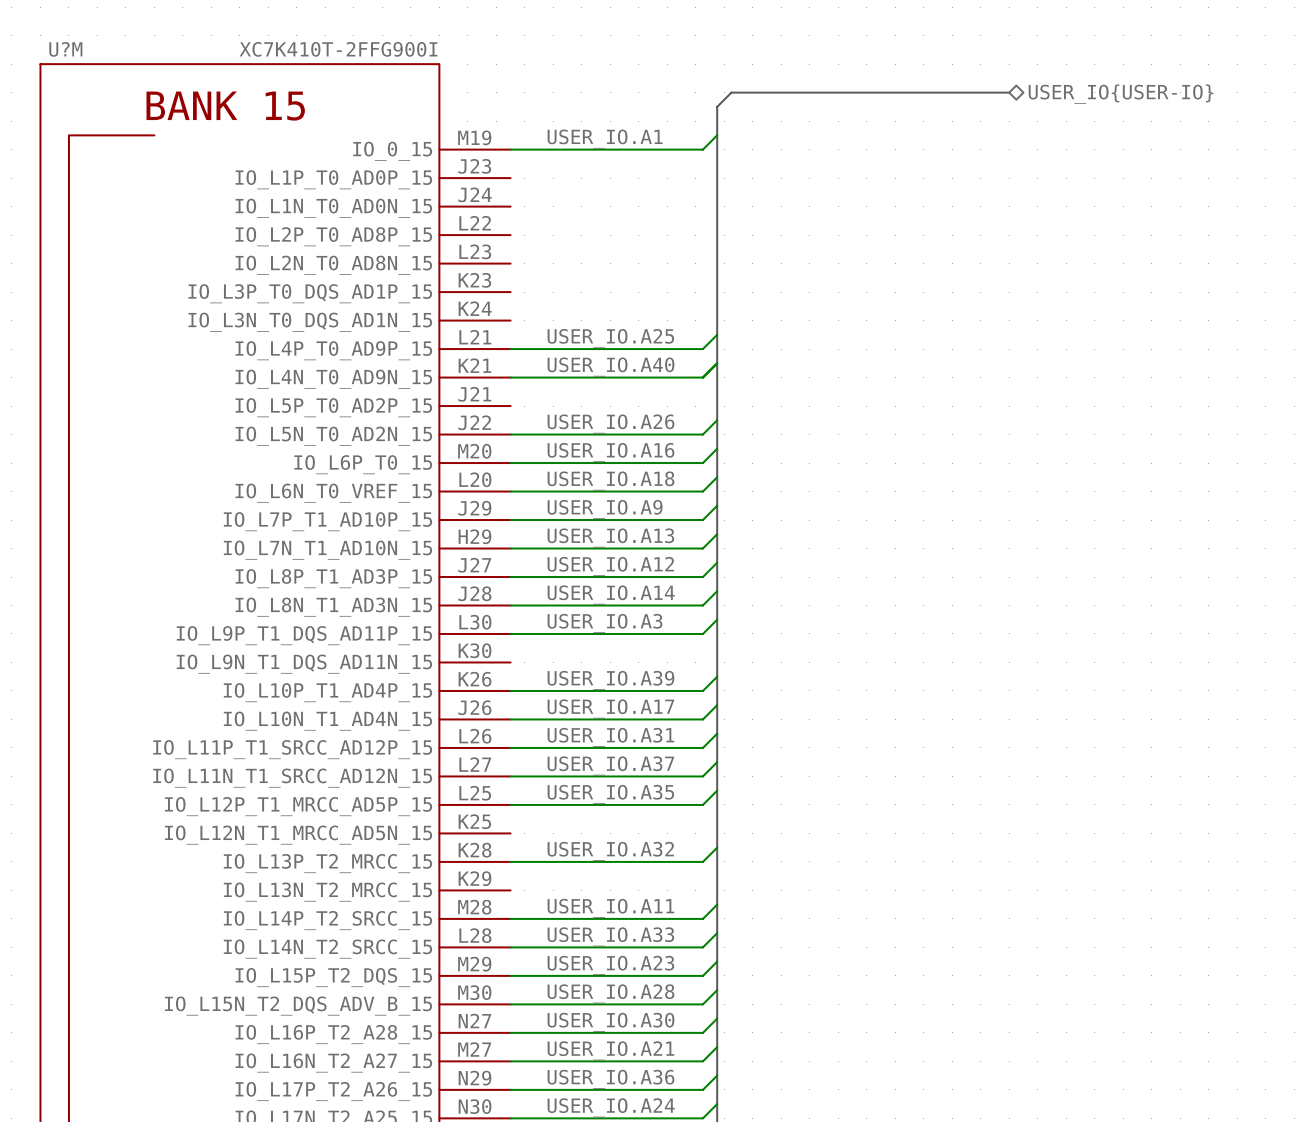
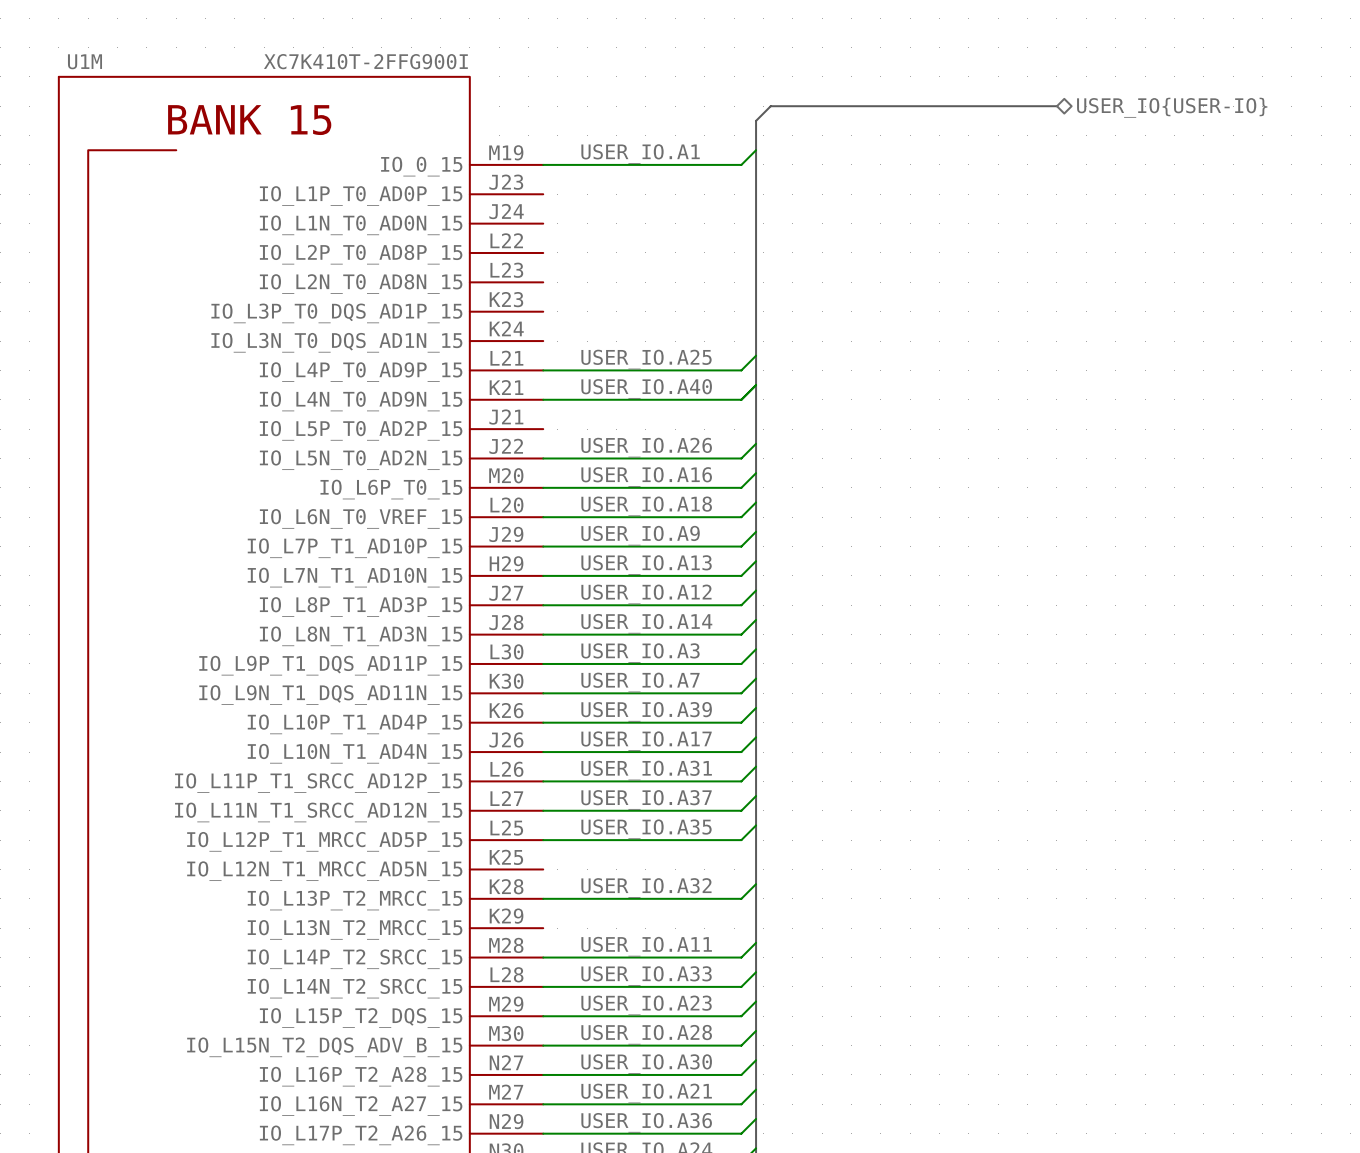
U?M name: U?M (65, 49) -> U1M (84, 61)
wire: none -> (756, 678) (741, 693) (543, 693)
label: none -> USER_IO.A7 (640, 682)

